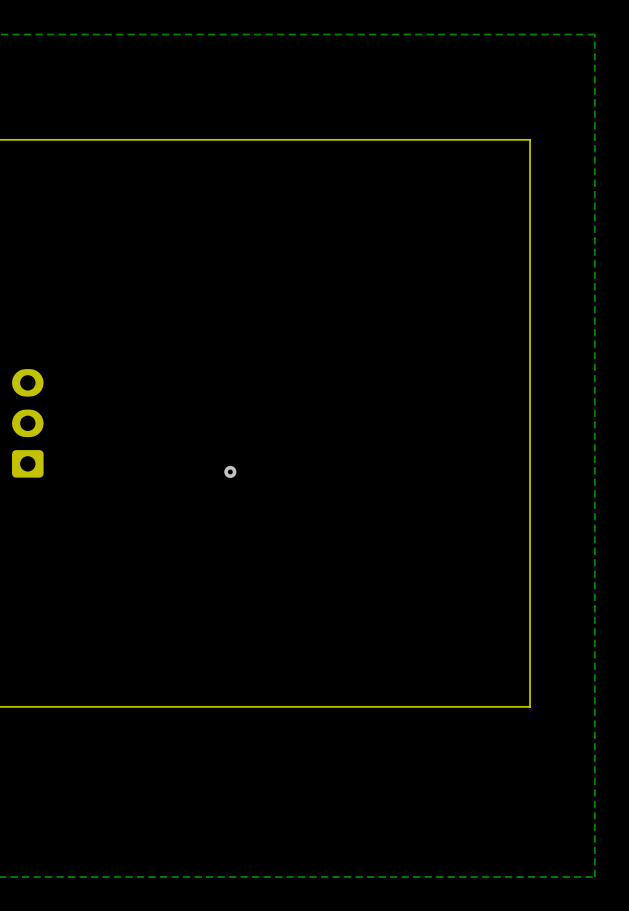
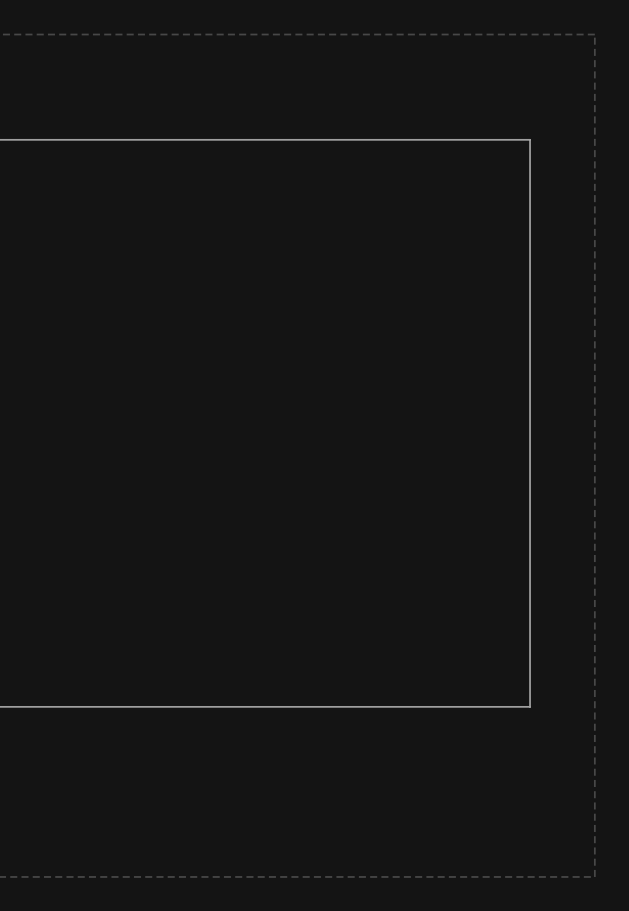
part: (27, 423) -> none
via: (230, 471) -> none

